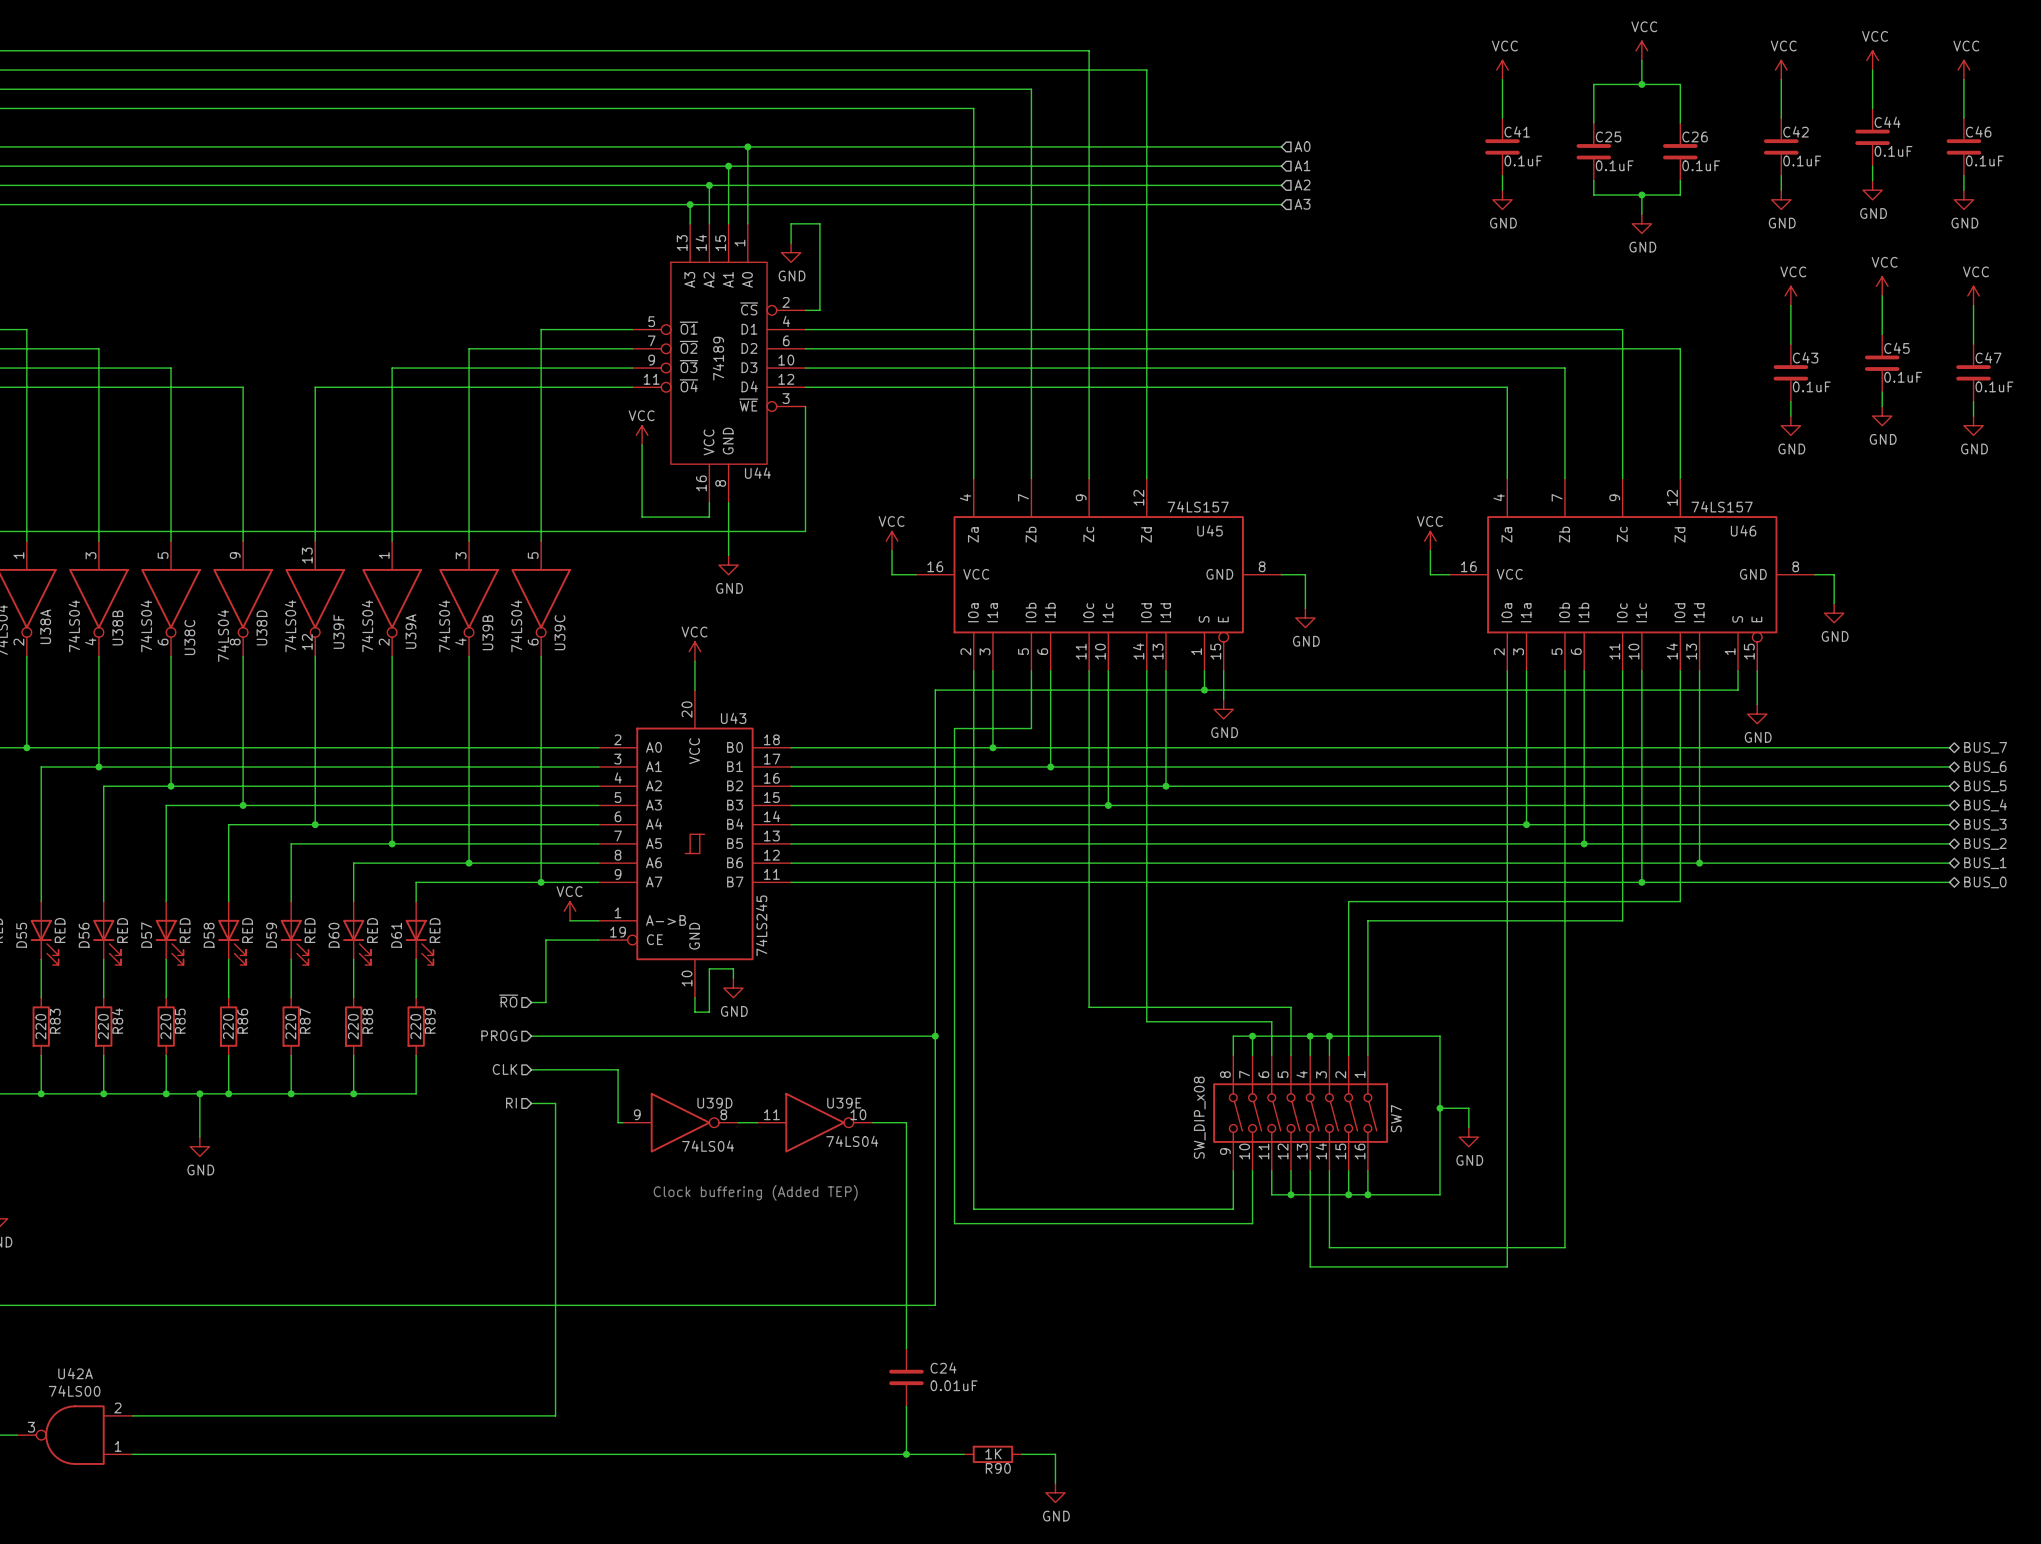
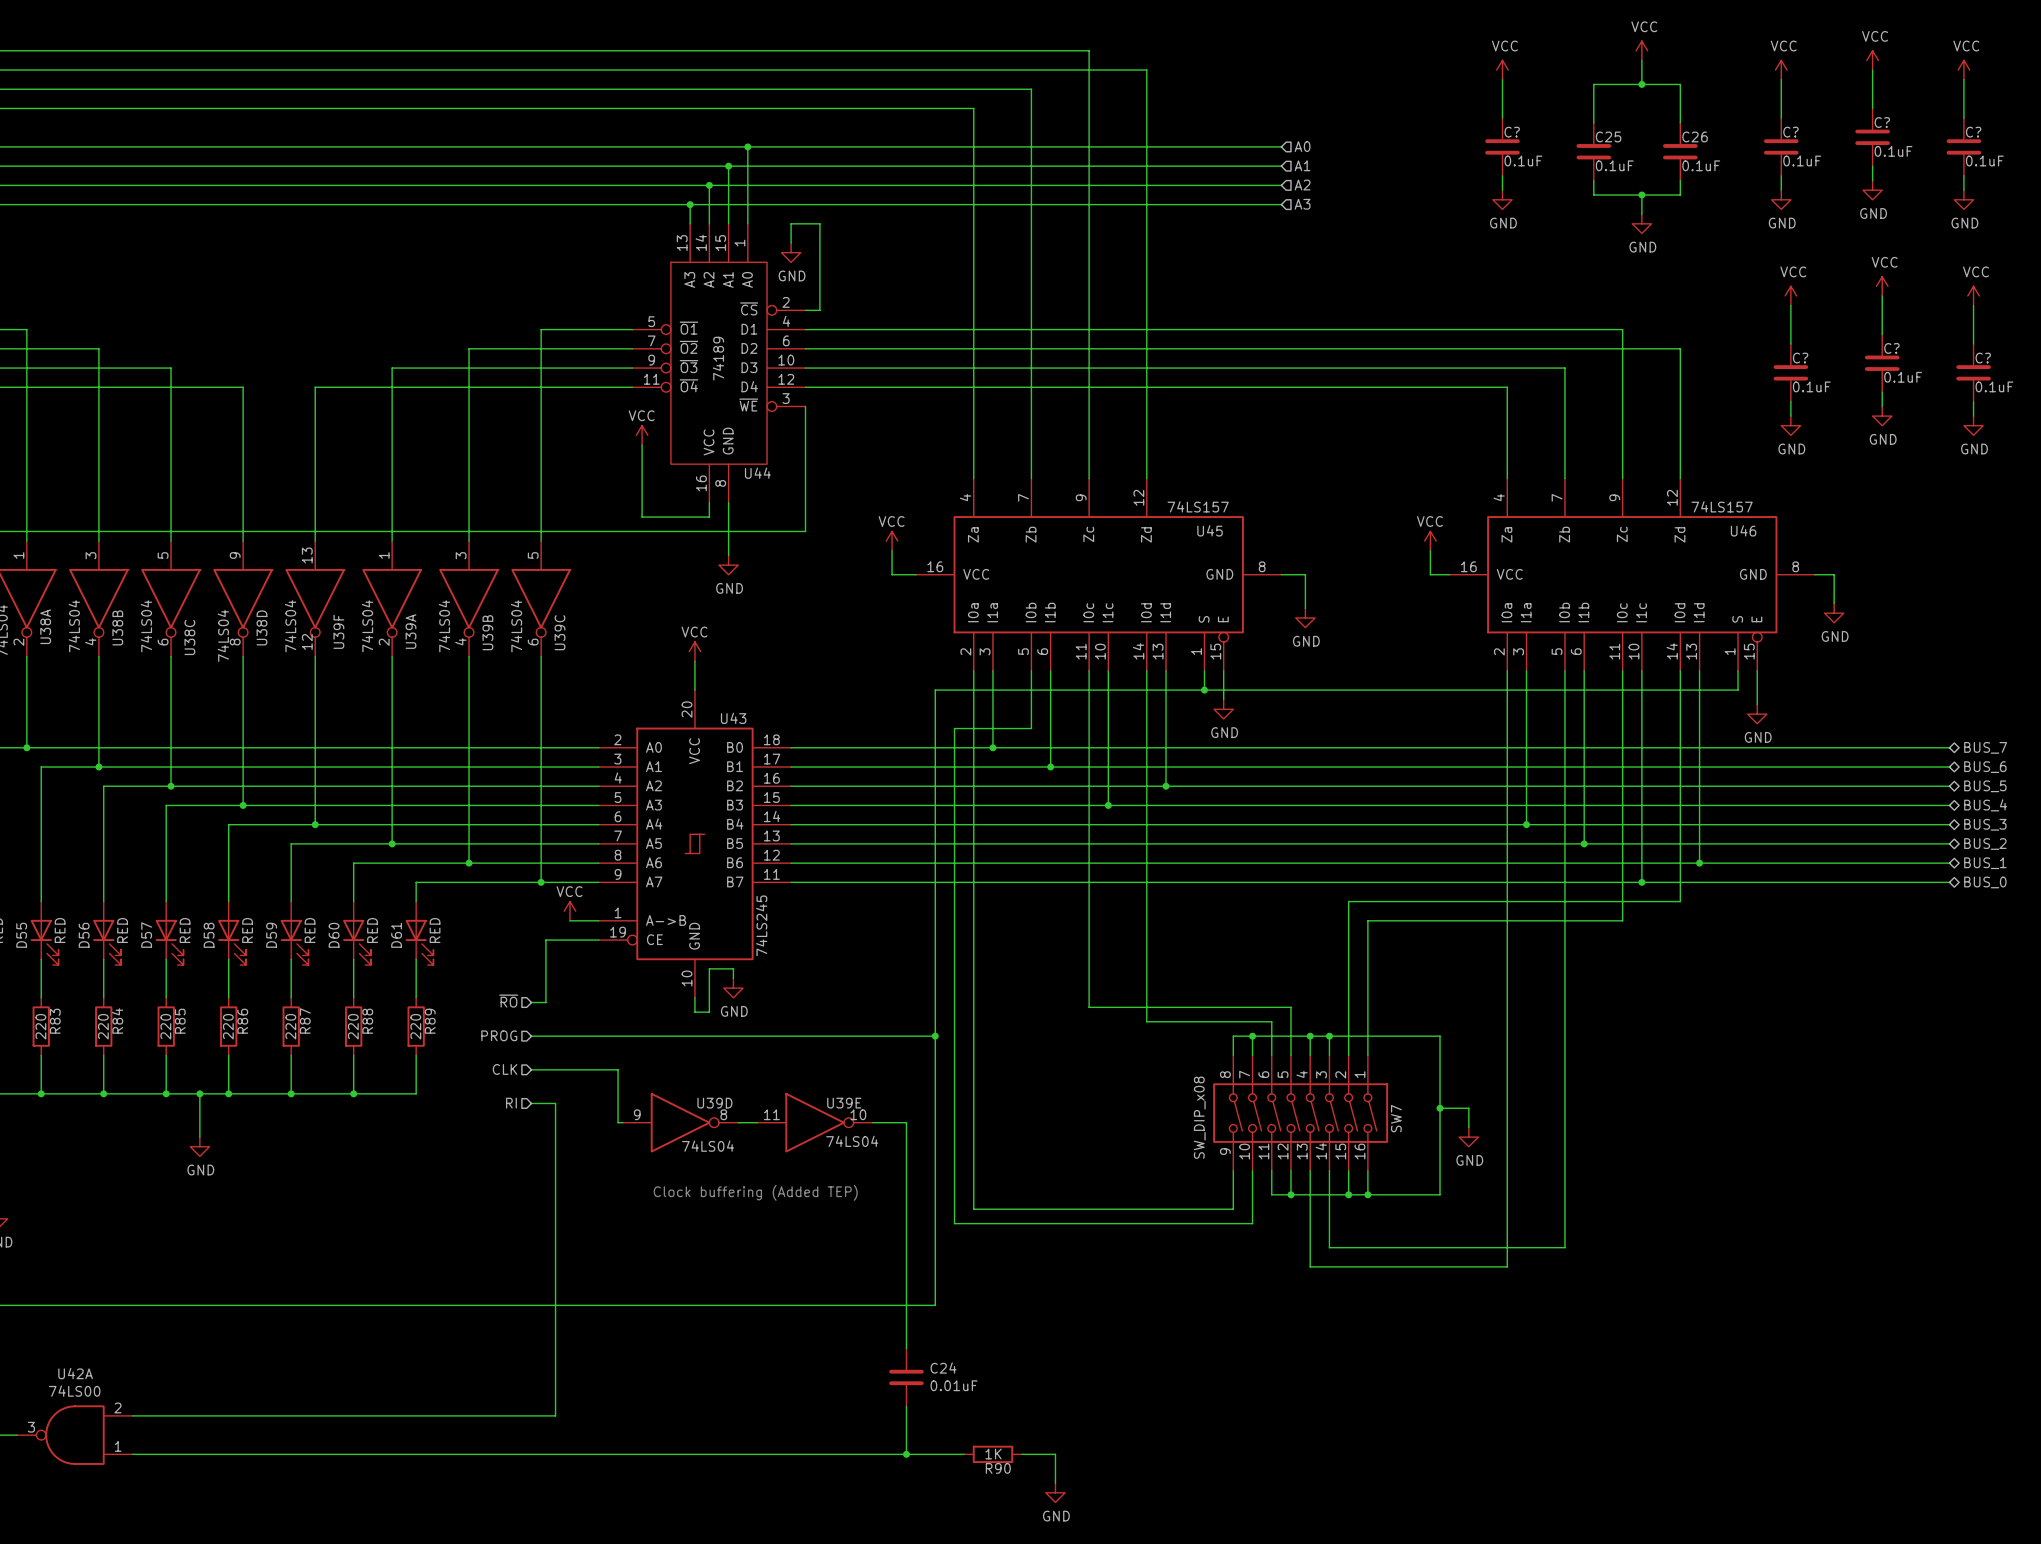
C44 name: C44 (1887, 122) -> C? (1882, 122)
C41 name: C41 (1517, 131) -> C? (1512, 132)
C42 name: C42 (1796, 131) -> C? (1790, 132)
C46 name: C46 (1978, 131) -> C? (1973, 132)
C45 name: C45 (1896, 348) -> C? (1891, 348)
C43 name: C43 (1805, 357) -> C? (1800, 358)
C47 name: C47 (1988, 357) -> C? (1983, 358)

